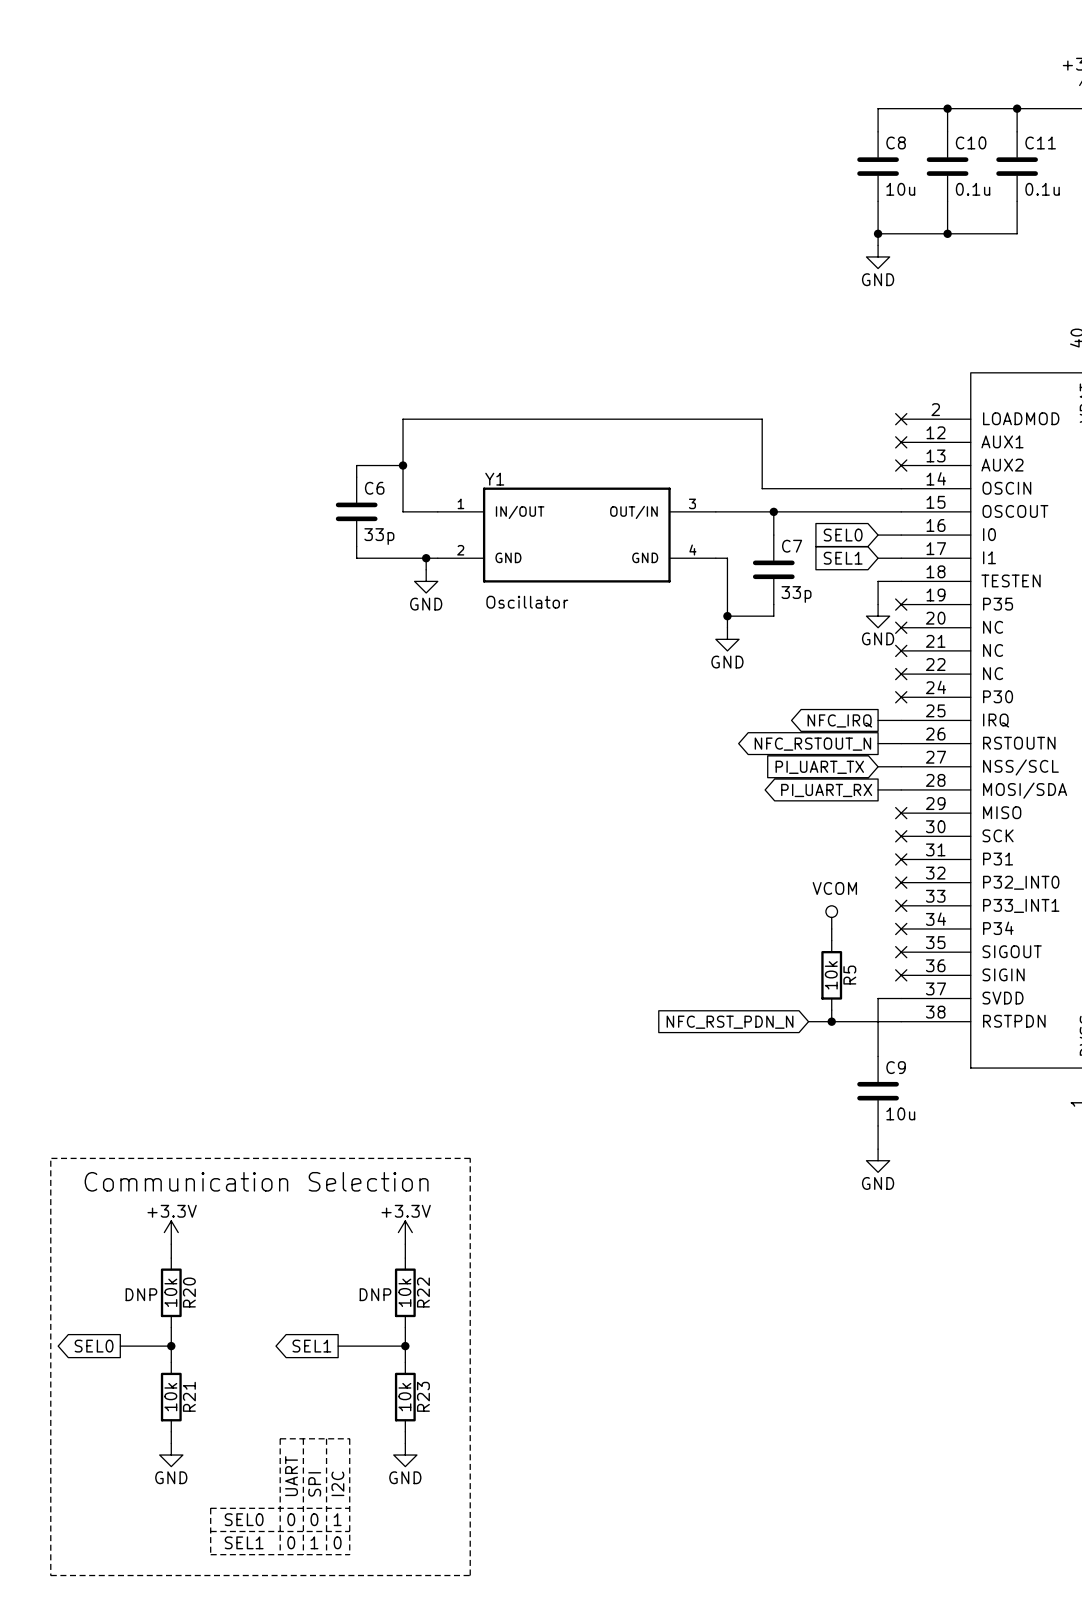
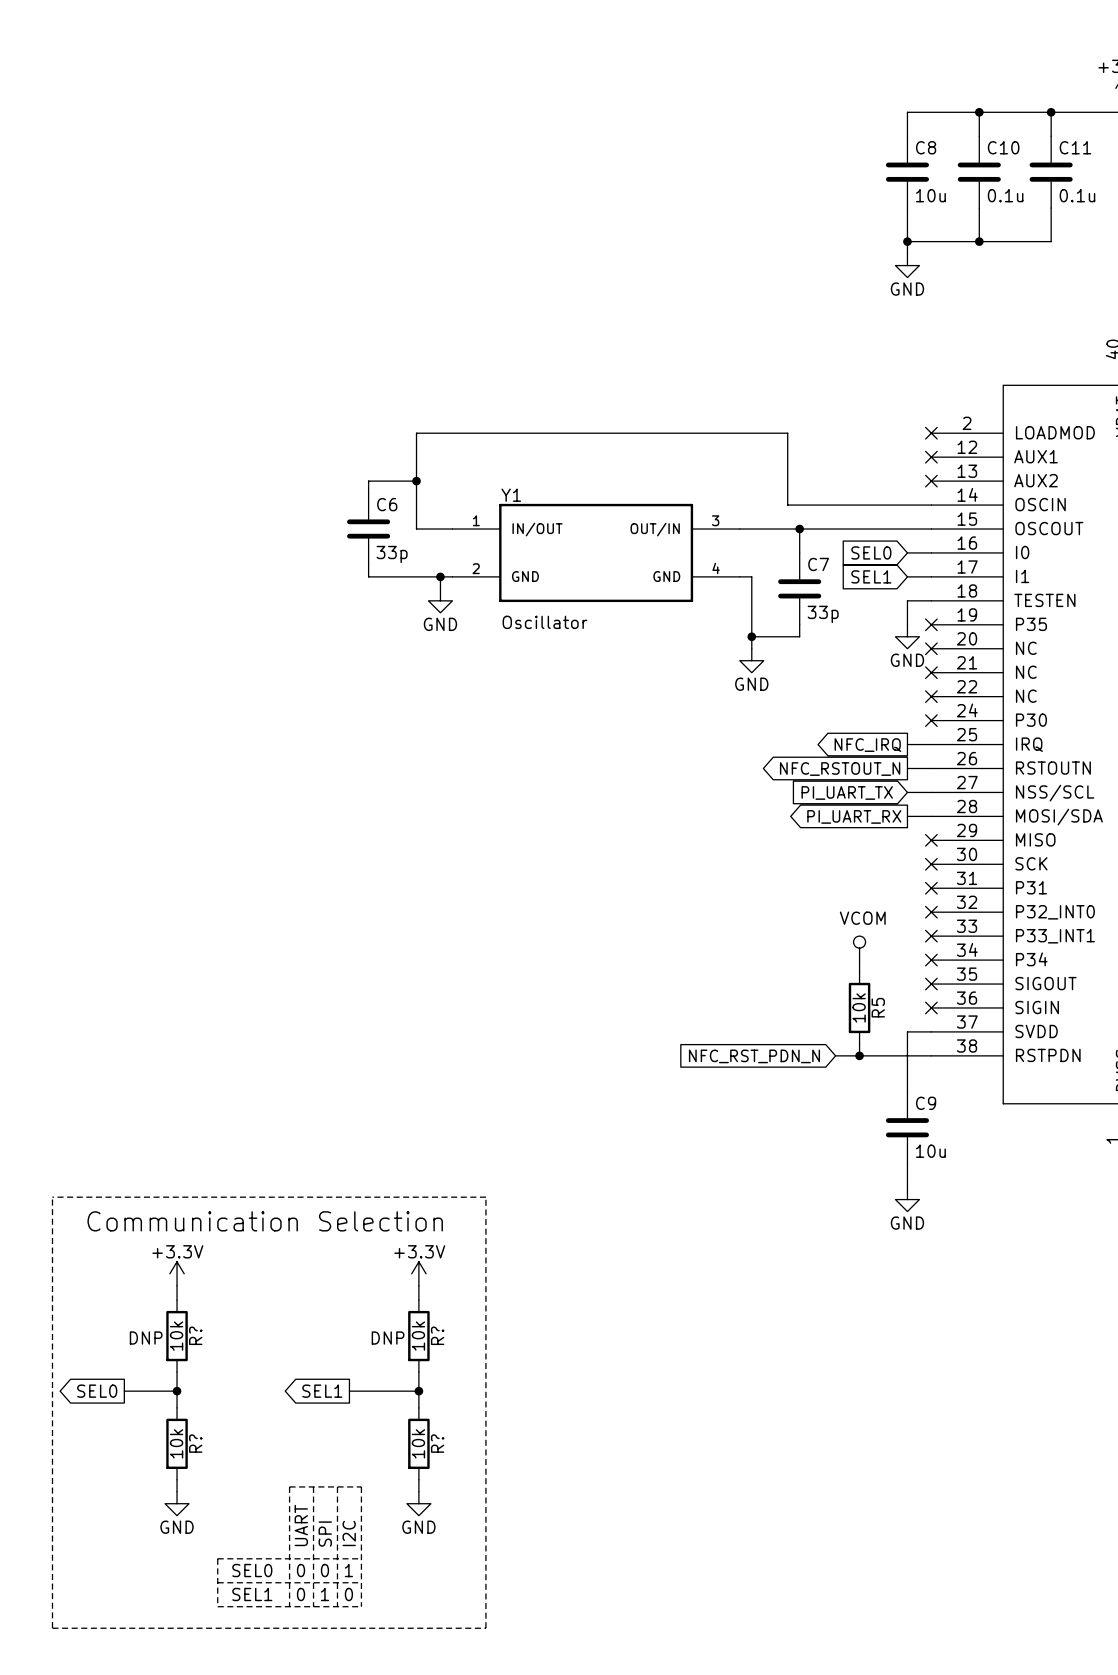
R20 name: R20 (189, 1292) -> R? (195, 1335)
R22 name: R22 (423, 1292) -> R? (437, 1335)
R21 name: R21 (189, 1396) -> R? (195, 1443)
R23 name: R23 (423, 1396) -> R? (437, 1443)

